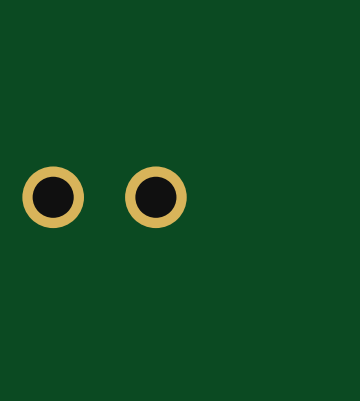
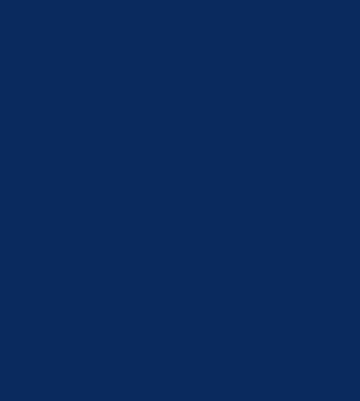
part: (104, 197) -> none

